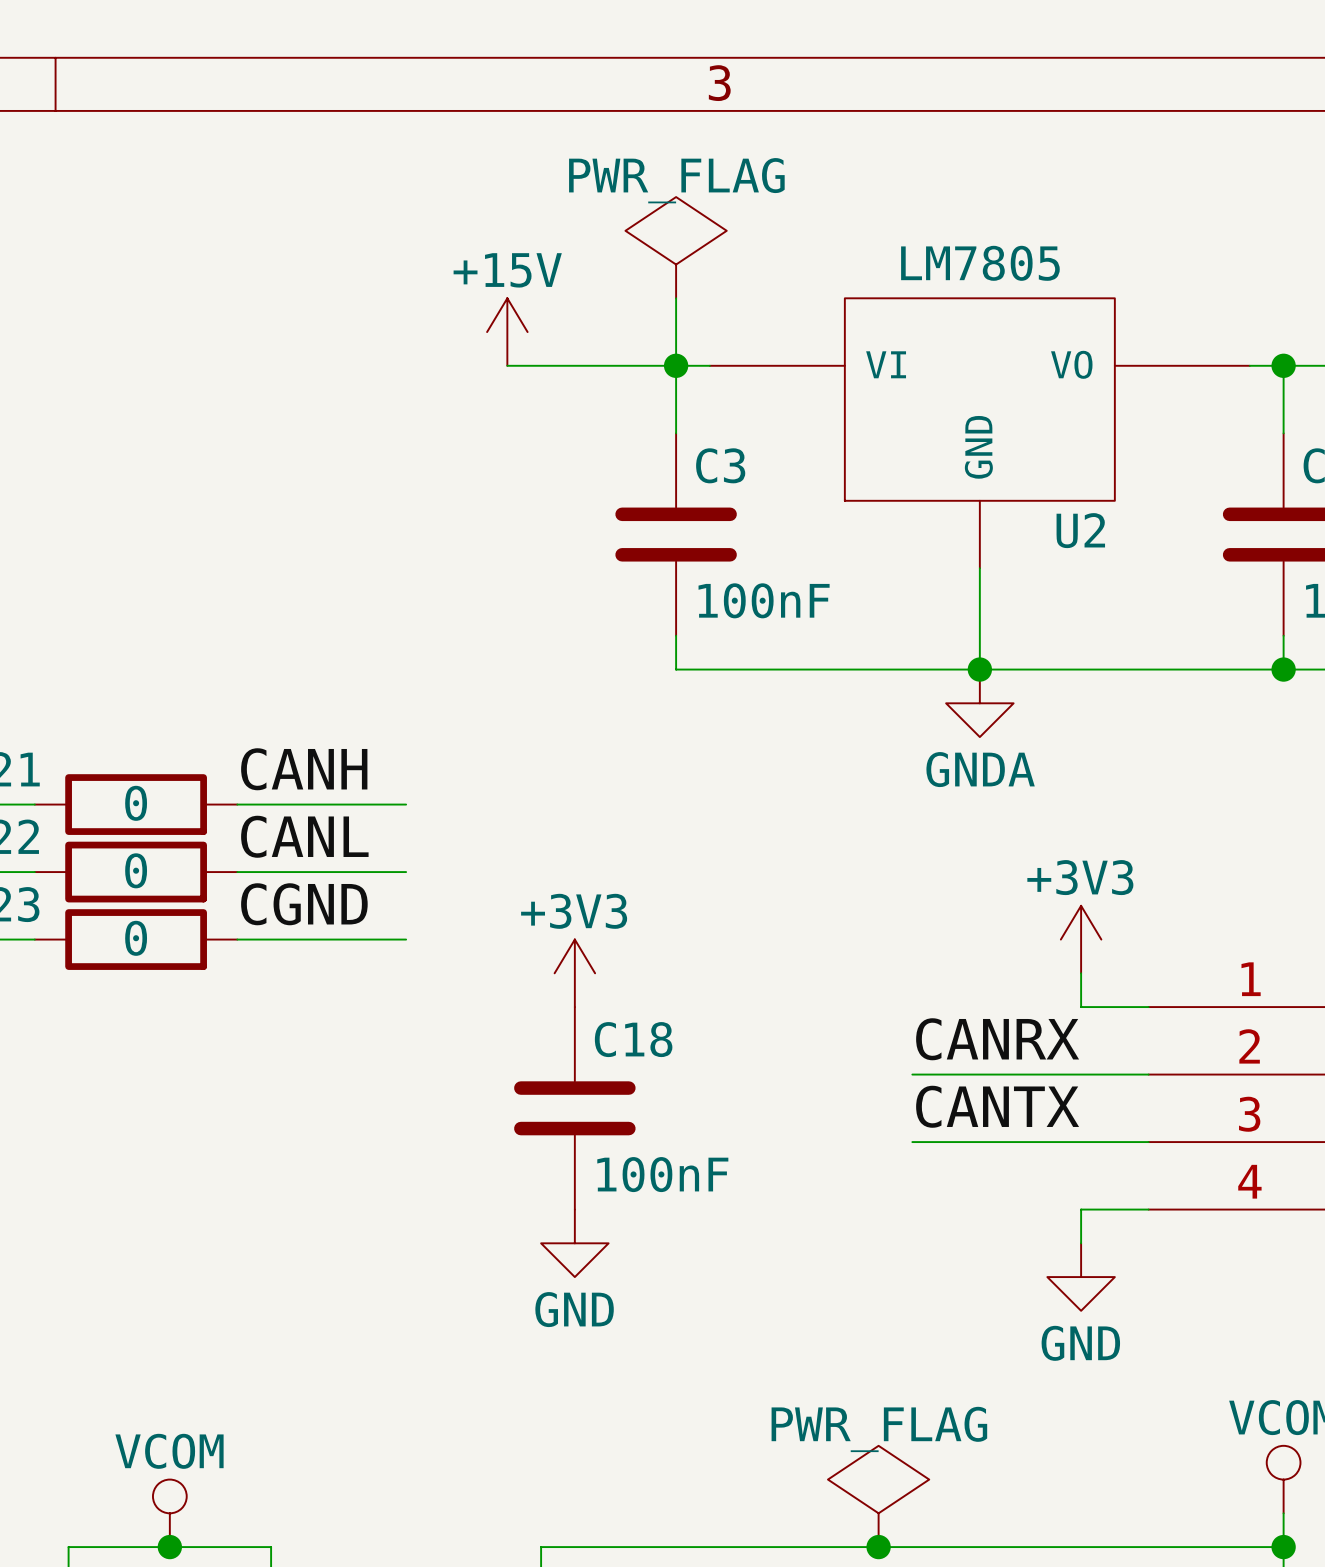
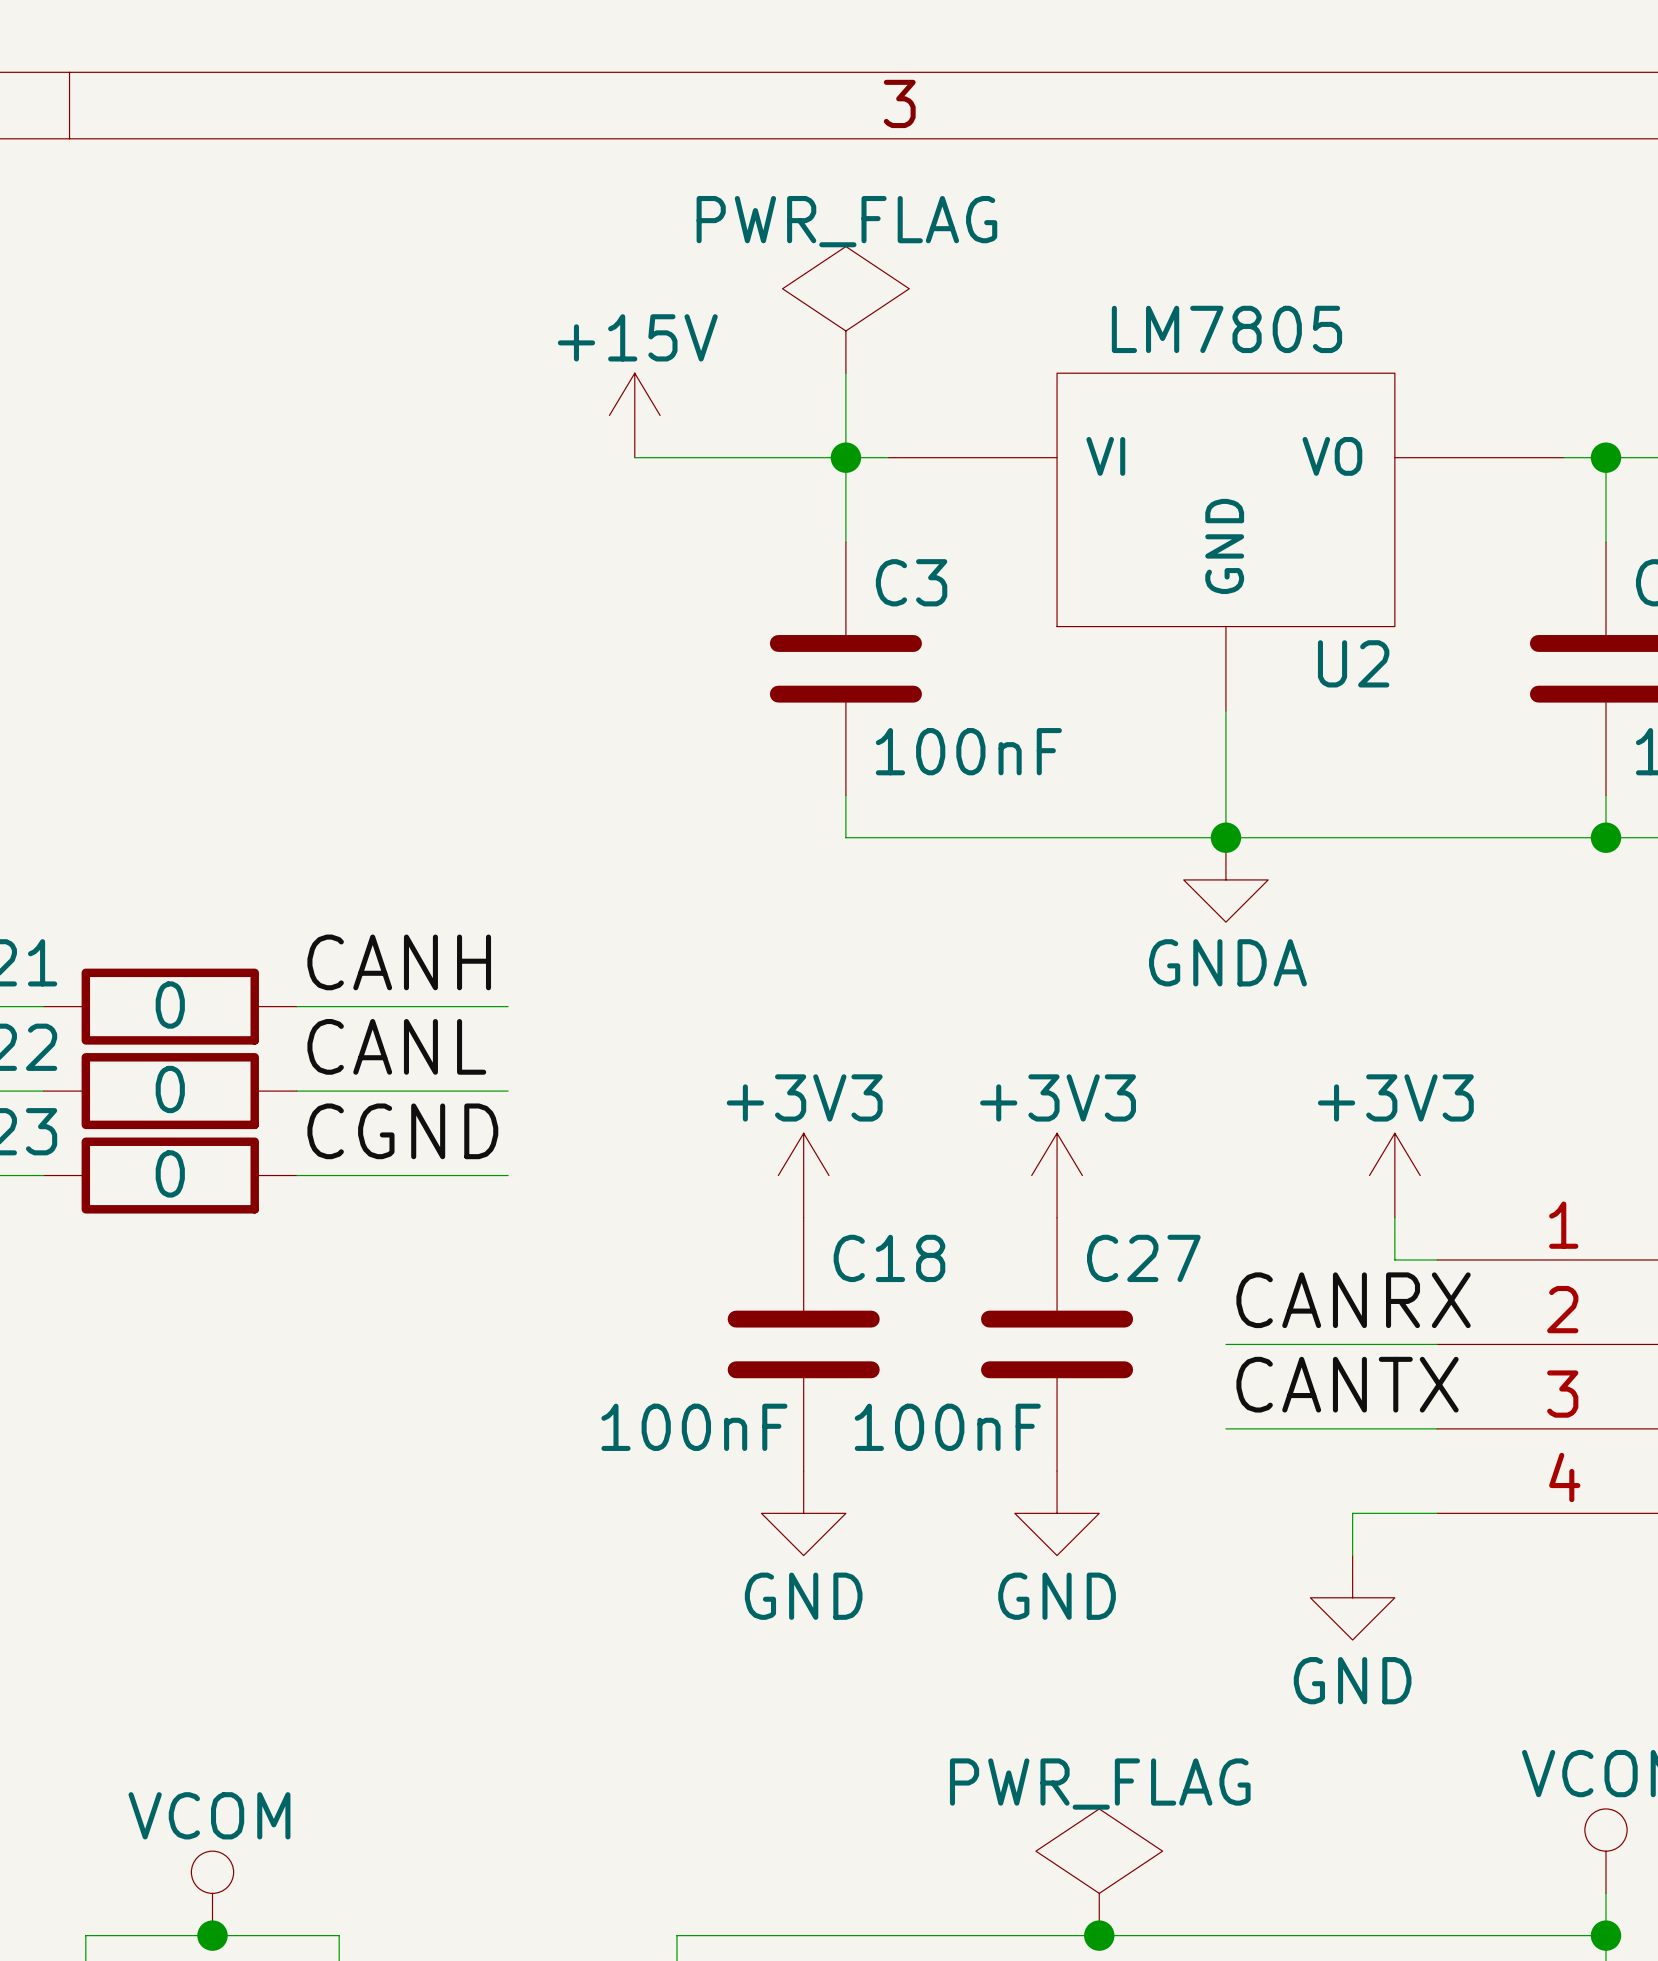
power symbol: none -> +3V3 (1057, 1175)
power symbol position: +3V3 (1081, 939) -> +3V3 (1394, 1175)
power symbol position: +3V3 (574, 973) -> +3V3 (803, 1175)
wire: (1081, 973) (1081, 1007) (1114, 1007) -> (1394, 1217) (1394, 1259)
label position: CANRX (997, 1039) -> CANRX (1353, 1300)
C27: none -> 100nF (1057, 1344)
wire: (912, 1074) (979, 1074) -> none
label position: CANTX (997, 1106) -> CANTX (1347, 1384)
C18 position: (574, 1108) -> (803, 1344)
wire: (912, 1142) (979, 1142) -> none
C18 value position: 100nF (662, 1174) -> 100nF (694, 1427)
power symbol: none -> GND (1057, 1513)
power symbol position: GND (574, 1243) -> GND (803, 1513)

